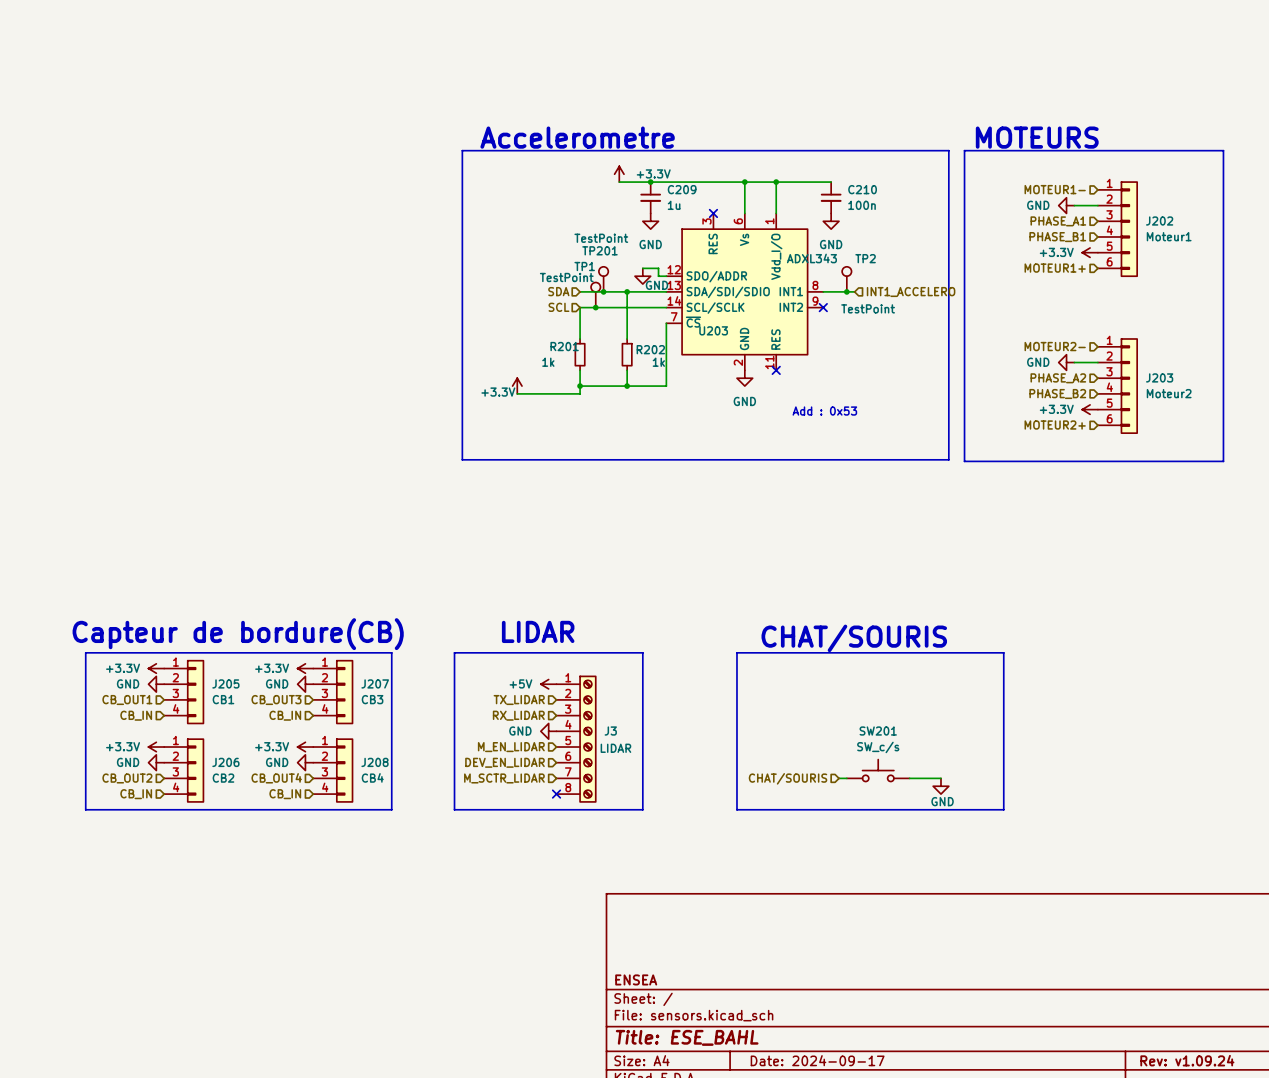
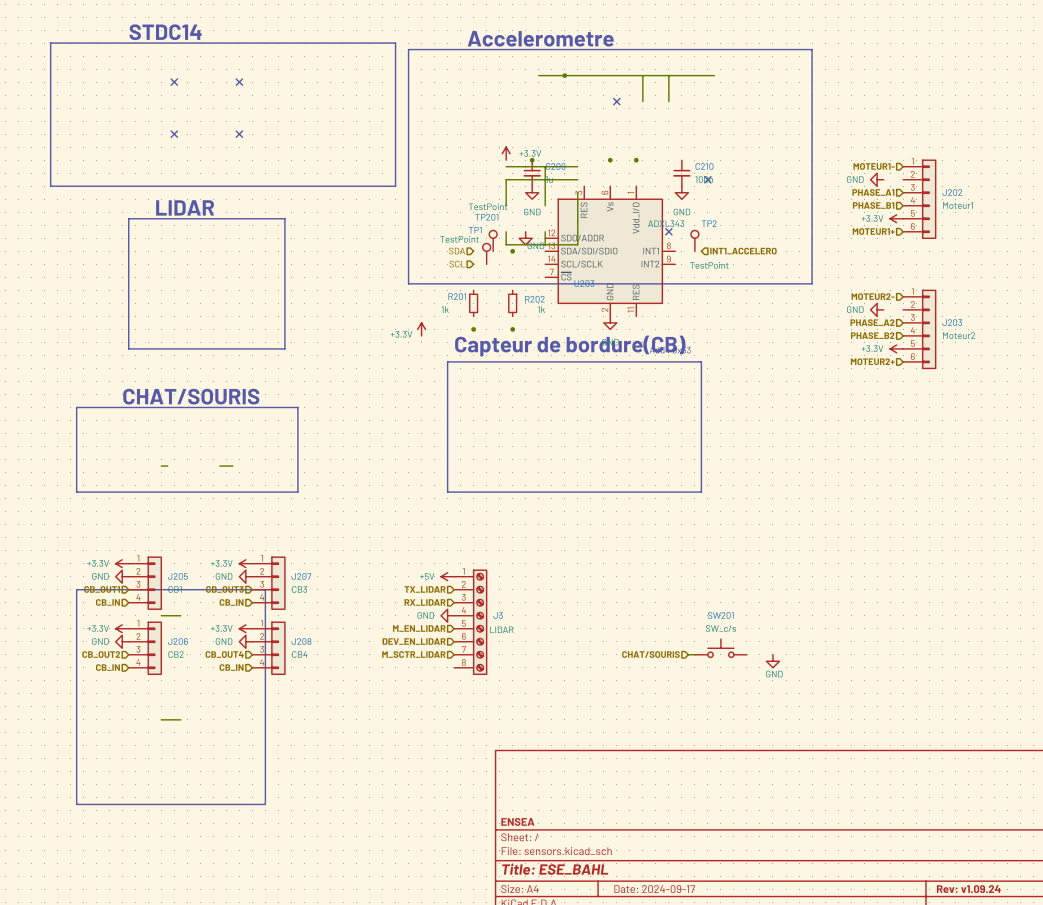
text: none -> STDC14 (165, 32)
line: none -> (50, 43) (395, 43) (395, 186) (50, 186) (50, 43)
line: none -> (408, 49) (812, 49) (812, 283) (408, 283) (408, 49)
junction: none -> (564, 75)
no-connect mark: none -> (174, 82)
no-connect mark: none -> (239, 82)
no-connect mark: none -> (616, 101)
text position: Accelerometre (577, 137) -> Accelerometre (540, 38)
text: MOTEURS (1037, 137) -> none
no-connect mark: none -> (174, 134)
no-connect mark: none -> (239, 134)
line: (462, 150) (948, 150) (948, 459) (462, 459) (462, 150) -> none
line: (964, 150) (1223, 150) (1223, 461) (964, 461) (964, 150) -> none
wire: (619, 182) (831, 182) -> (538, 75) (714, 75)
wire: (744, 182) (744, 213) -> (642, 75) (642, 101)
wire: (776, 182) (776, 213) -> (668, 75) (668, 101)
no-connect mark: none -> (707, 179)
wire: (1074, 205) (1097, 205) -> none
no-connect mark: (713, 213) -> none
wire: none -> (577, 192) (577, 244) (506, 244) (506, 231)
text: none -> LIDAR (185, 207)
line: none -> (128, 218) (284, 218) (284, 348) (128, 348) (128, 218)
wire: (642, 268) (658, 268) (658, 276) (666, 276) -> none
no-connect mark: none -> (668, 231)
wire: (580, 291) (666, 291) -> (506, 166) (577, 166)
junction: (603, 291) -> none
wire: (627, 291) (627, 338) -> (545, 166) (545, 205)
wire: (823, 291) (854, 291) -> none
junction: (846, 291) -> none
junction: (595, 307) -> none
wire: (666, 307) (580, 307) (580, 338) -> (577, 179) (506, 179) (506, 205)
no-connect mark: (823, 307) -> none
wire: (666, 323) (666, 386) (580, 386) -> none
wire: (1074, 362) (1097, 362) -> none
wire: (580, 370) (580, 393) (517, 393) -> none
wire: (627, 370) (627, 386) -> (545, 231) (545, 244)
no-connect mark: (776, 370) -> none
text: none -> Capteur de bordure(CB) (570, 345)
line: none -> (447, 361) (701, 361) (701, 492) (447, 492) (447, 361)
text: none -> CHAT/SOURIS (191, 396)
line: none -> (76, 407) (76, 492) (297, 492) (297, 407) (76, 407)
wire: none -> (161, 466) (167, 466)
wire: none -> (219, 466) (232, 466)
text: LIDAR (538, 631) -> none
text: Capteur de bordure(CB) (238, 634) -> none
text: CHAT/SOURIS (854, 638) -> none
line: (85, 652) (391, 652) (391, 809) (85, 809) (85, 652) -> none
line: (454, 652) (642, 652) (642, 809) (454, 809) (454, 652) -> none
line: (736, 652) (1003, 652) (1003, 809) (736, 809) (736, 652) -> none
line: none -> (76, 589) (265, 589) (265, 804) (76, 804) (76, 589)
wire: none -> (161, 615) (180, 615)
wire: (909, 778) (940, 778) -> none
no-connect mark: (556, 794) -> none
wire: none -> (161, 719) (180, 719)

